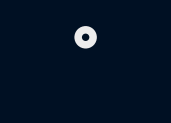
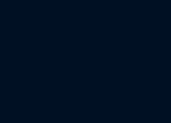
via: (85, 37) -> none

